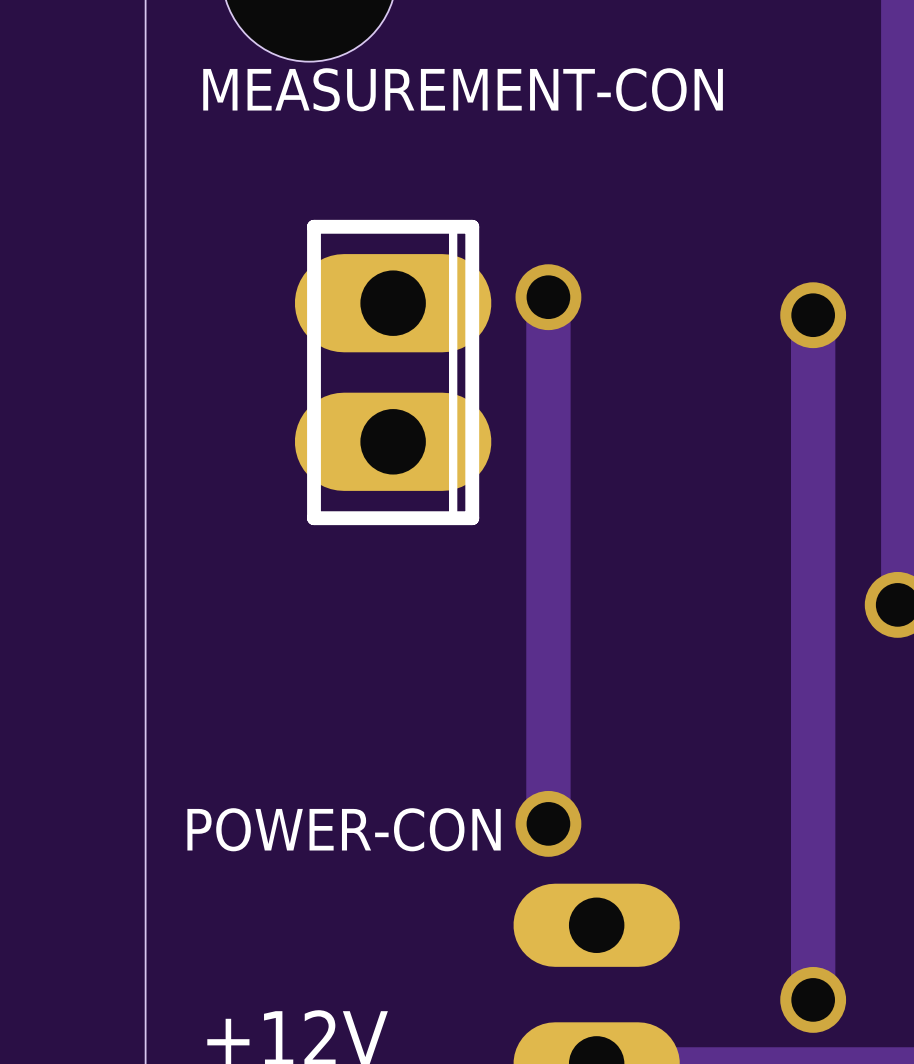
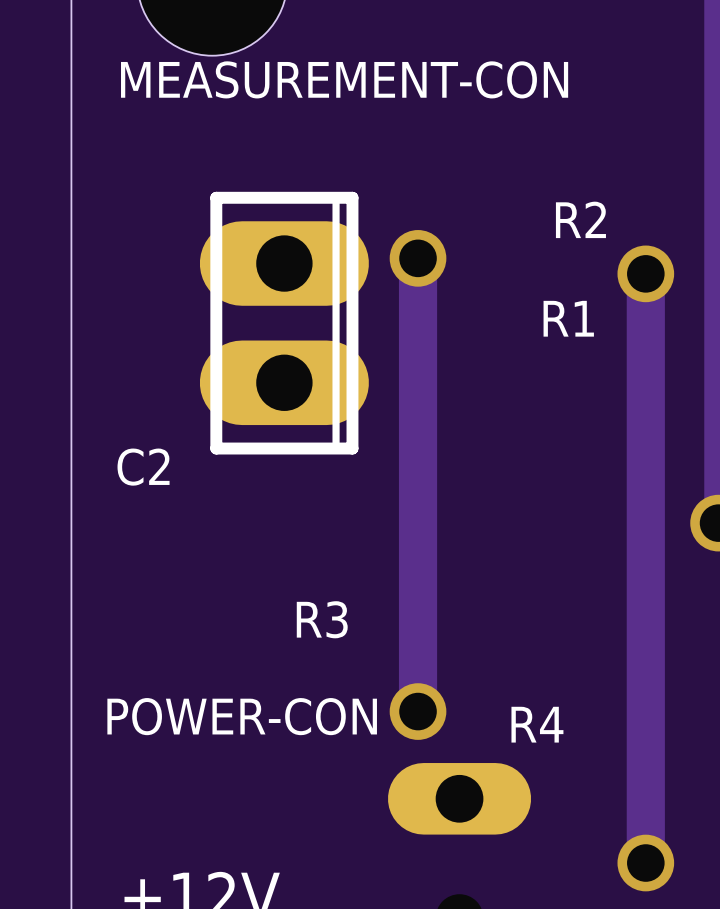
R2: none -> (580, 219)
R1: none -> (568, 318)
C2: none -> (143, 467)
R3: none -> (322, 619)
R4: none -> (537, 724)

